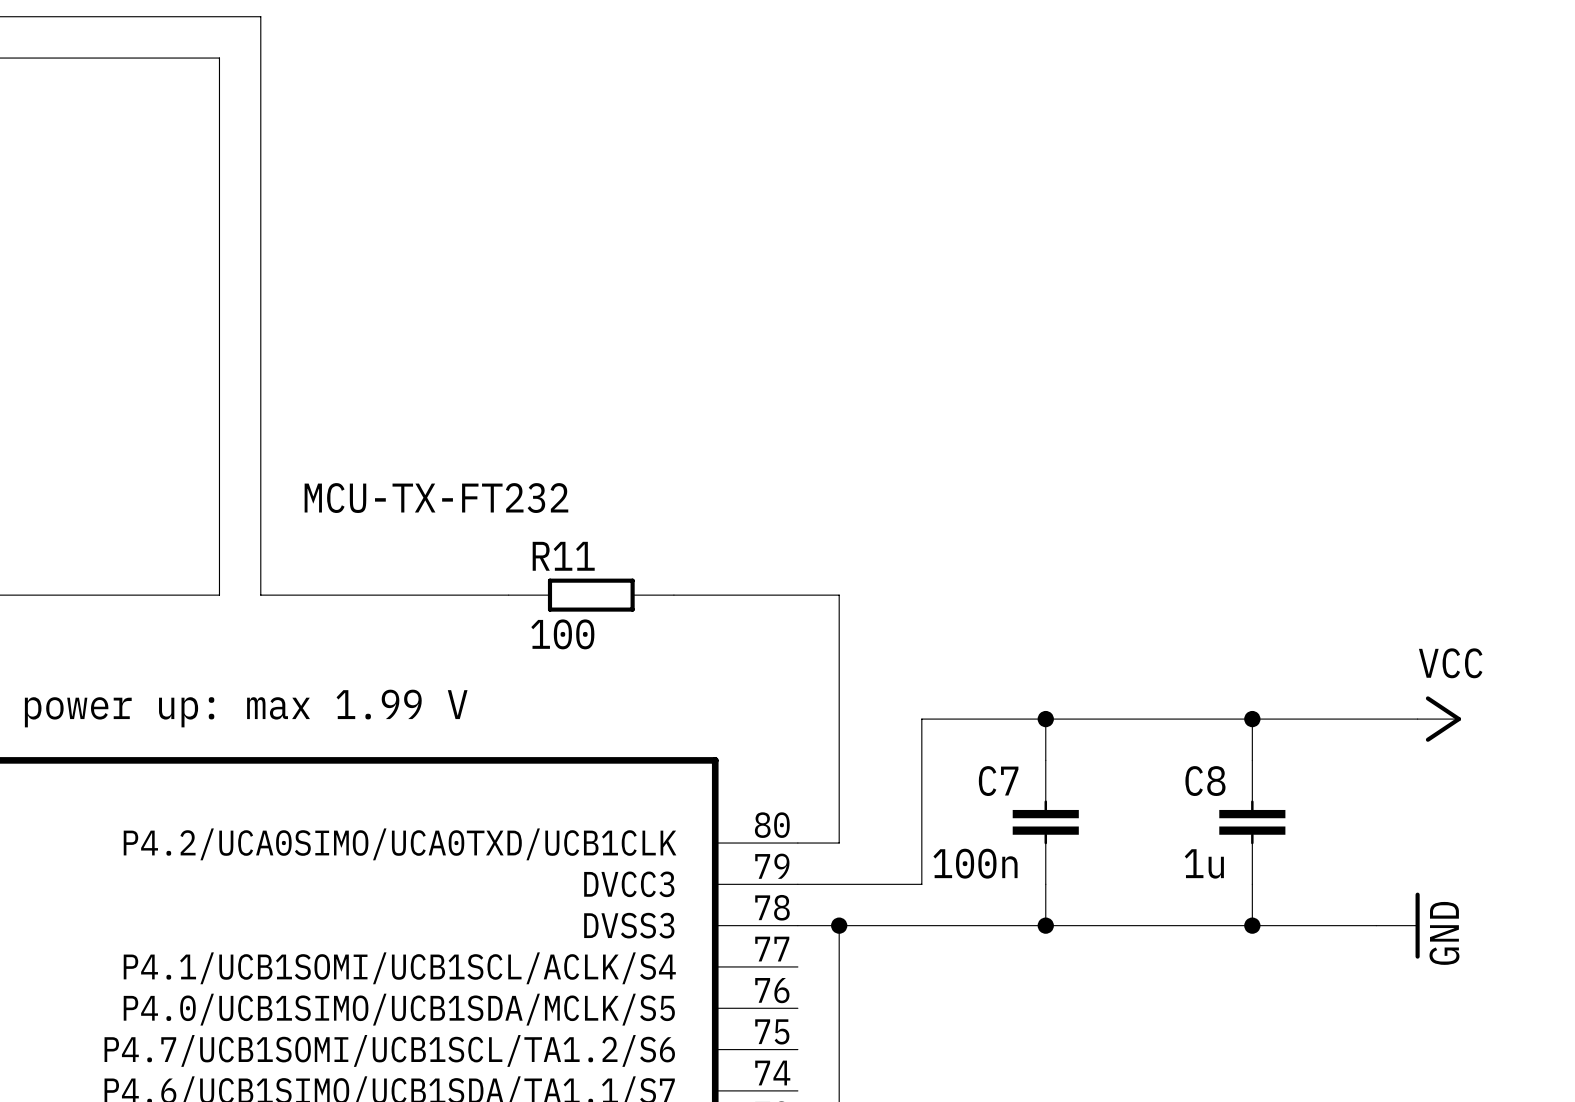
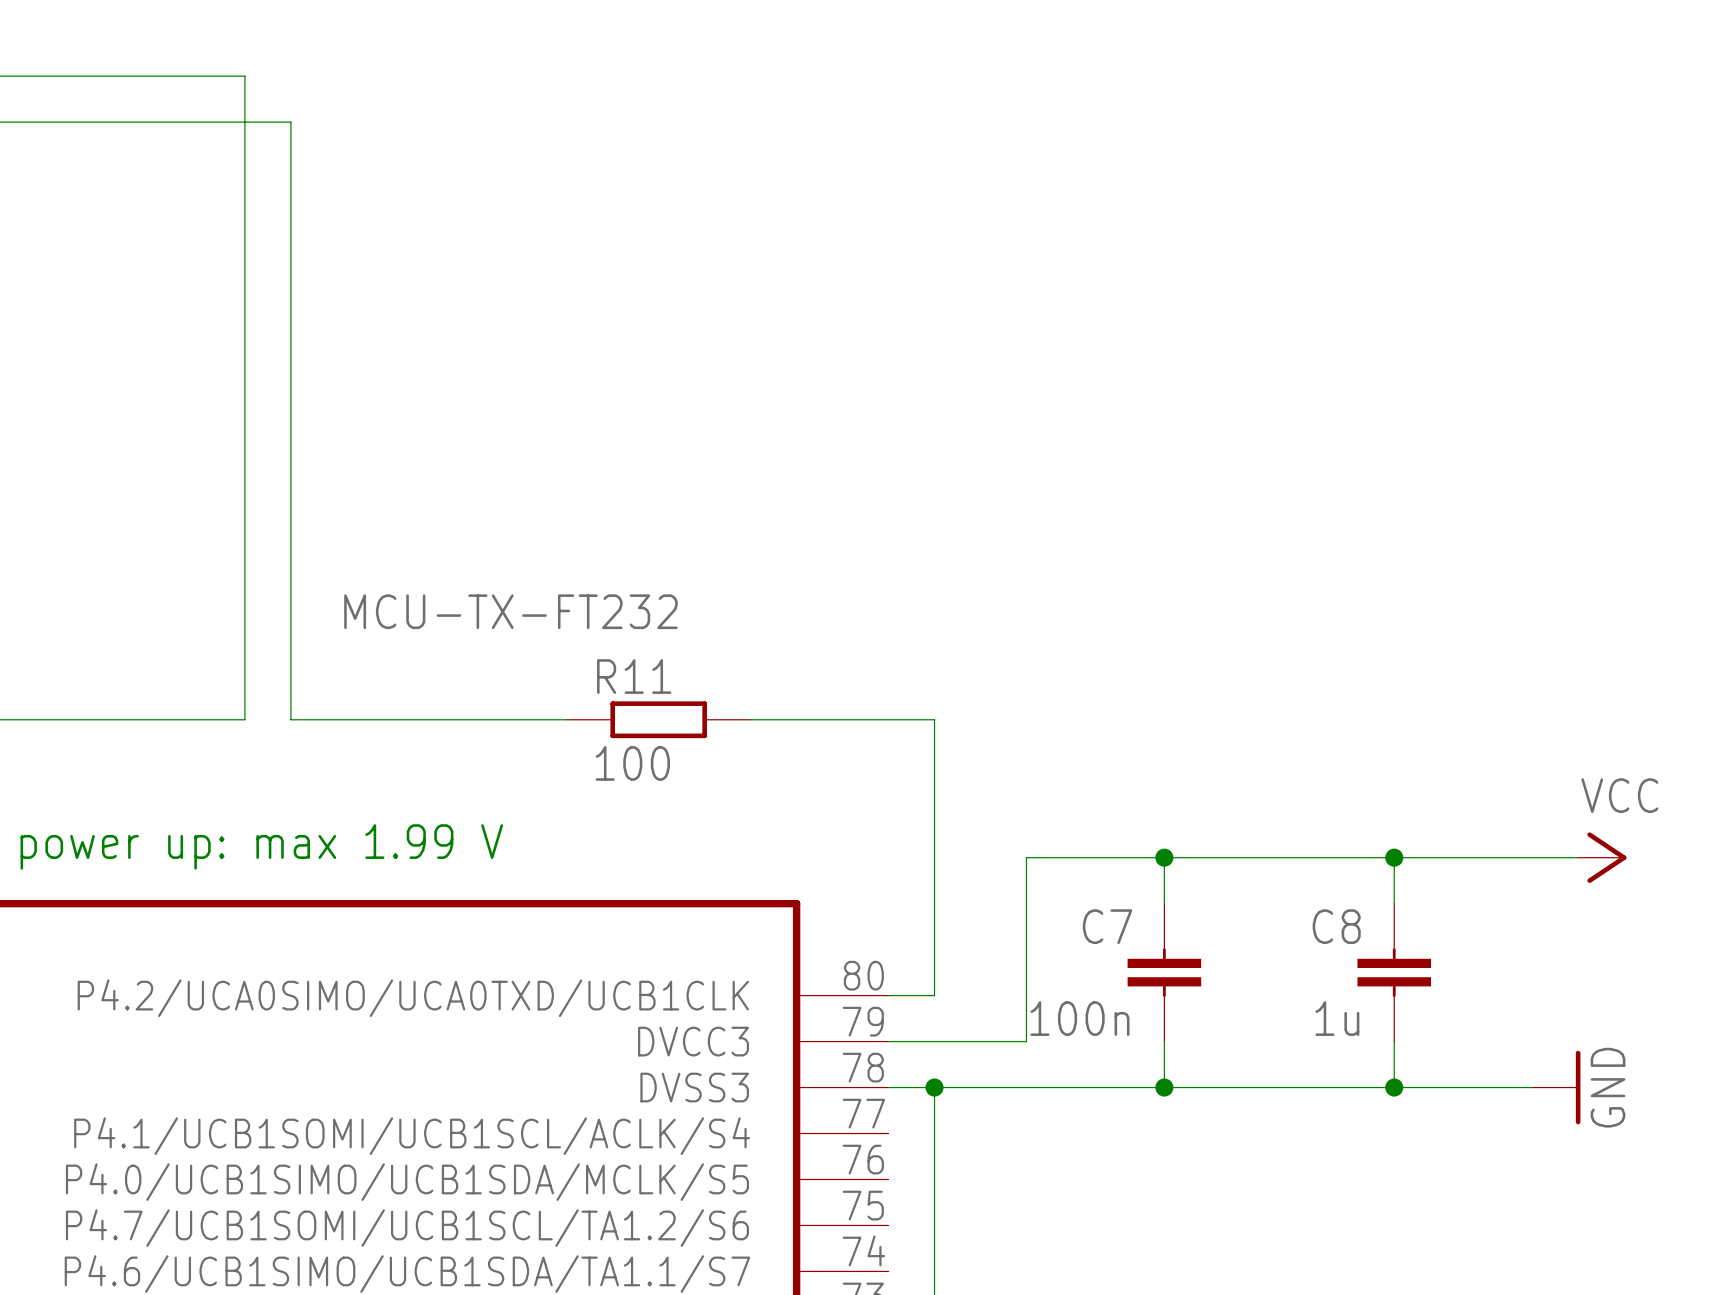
wire: (219, 16) (260, 16) (260, 58) -> (244, 76) (244, 122) (290, 122)

